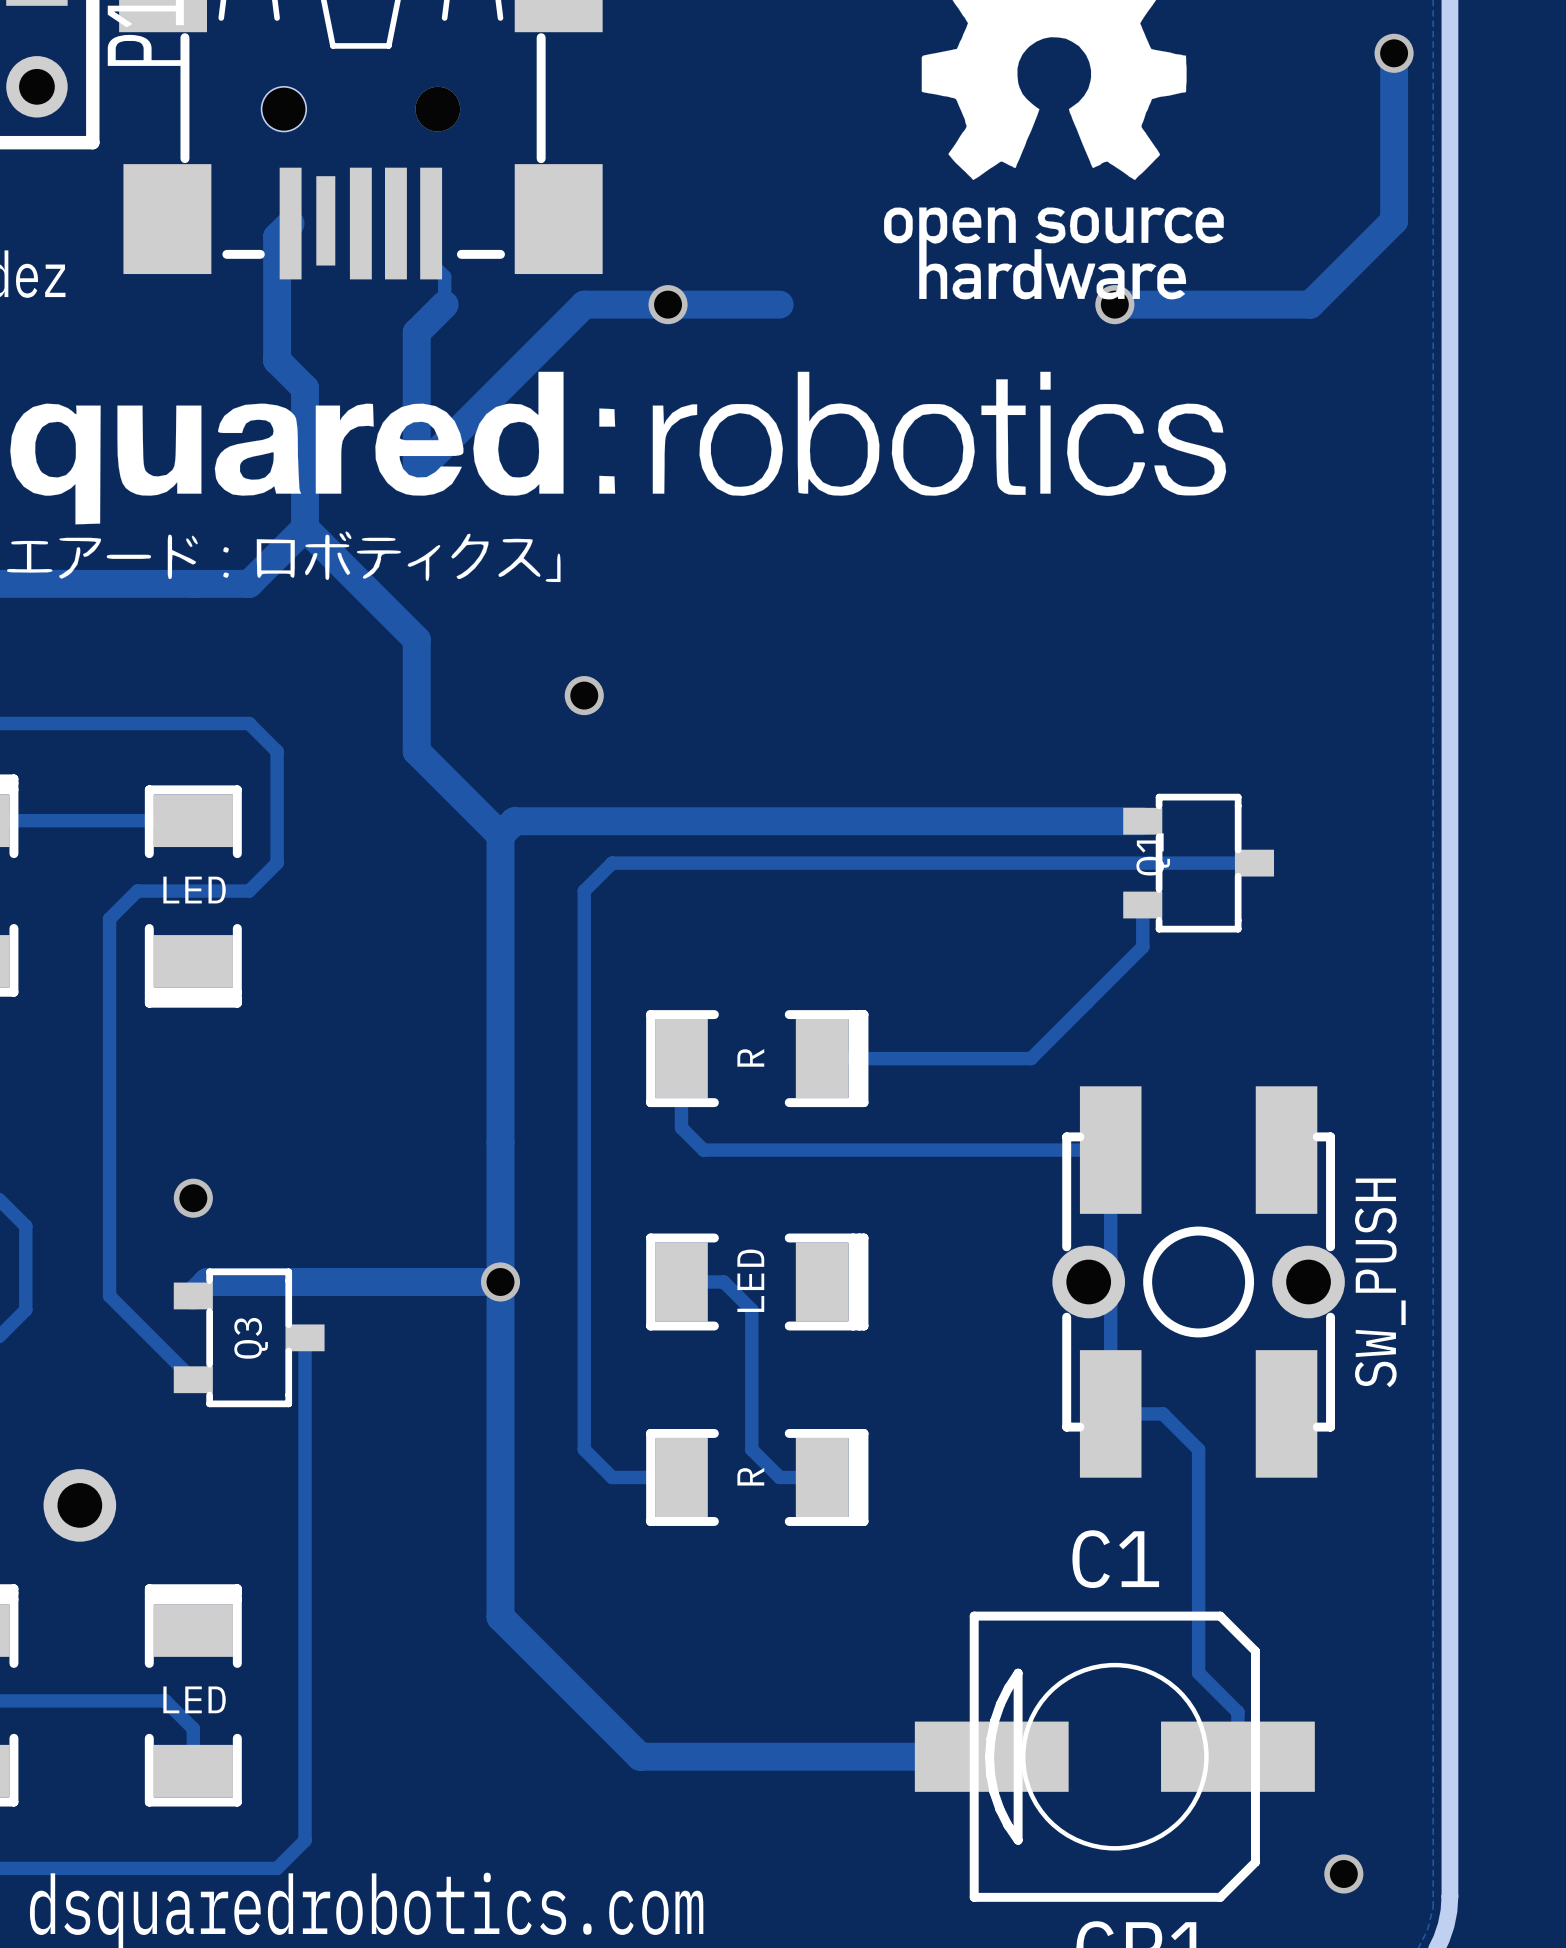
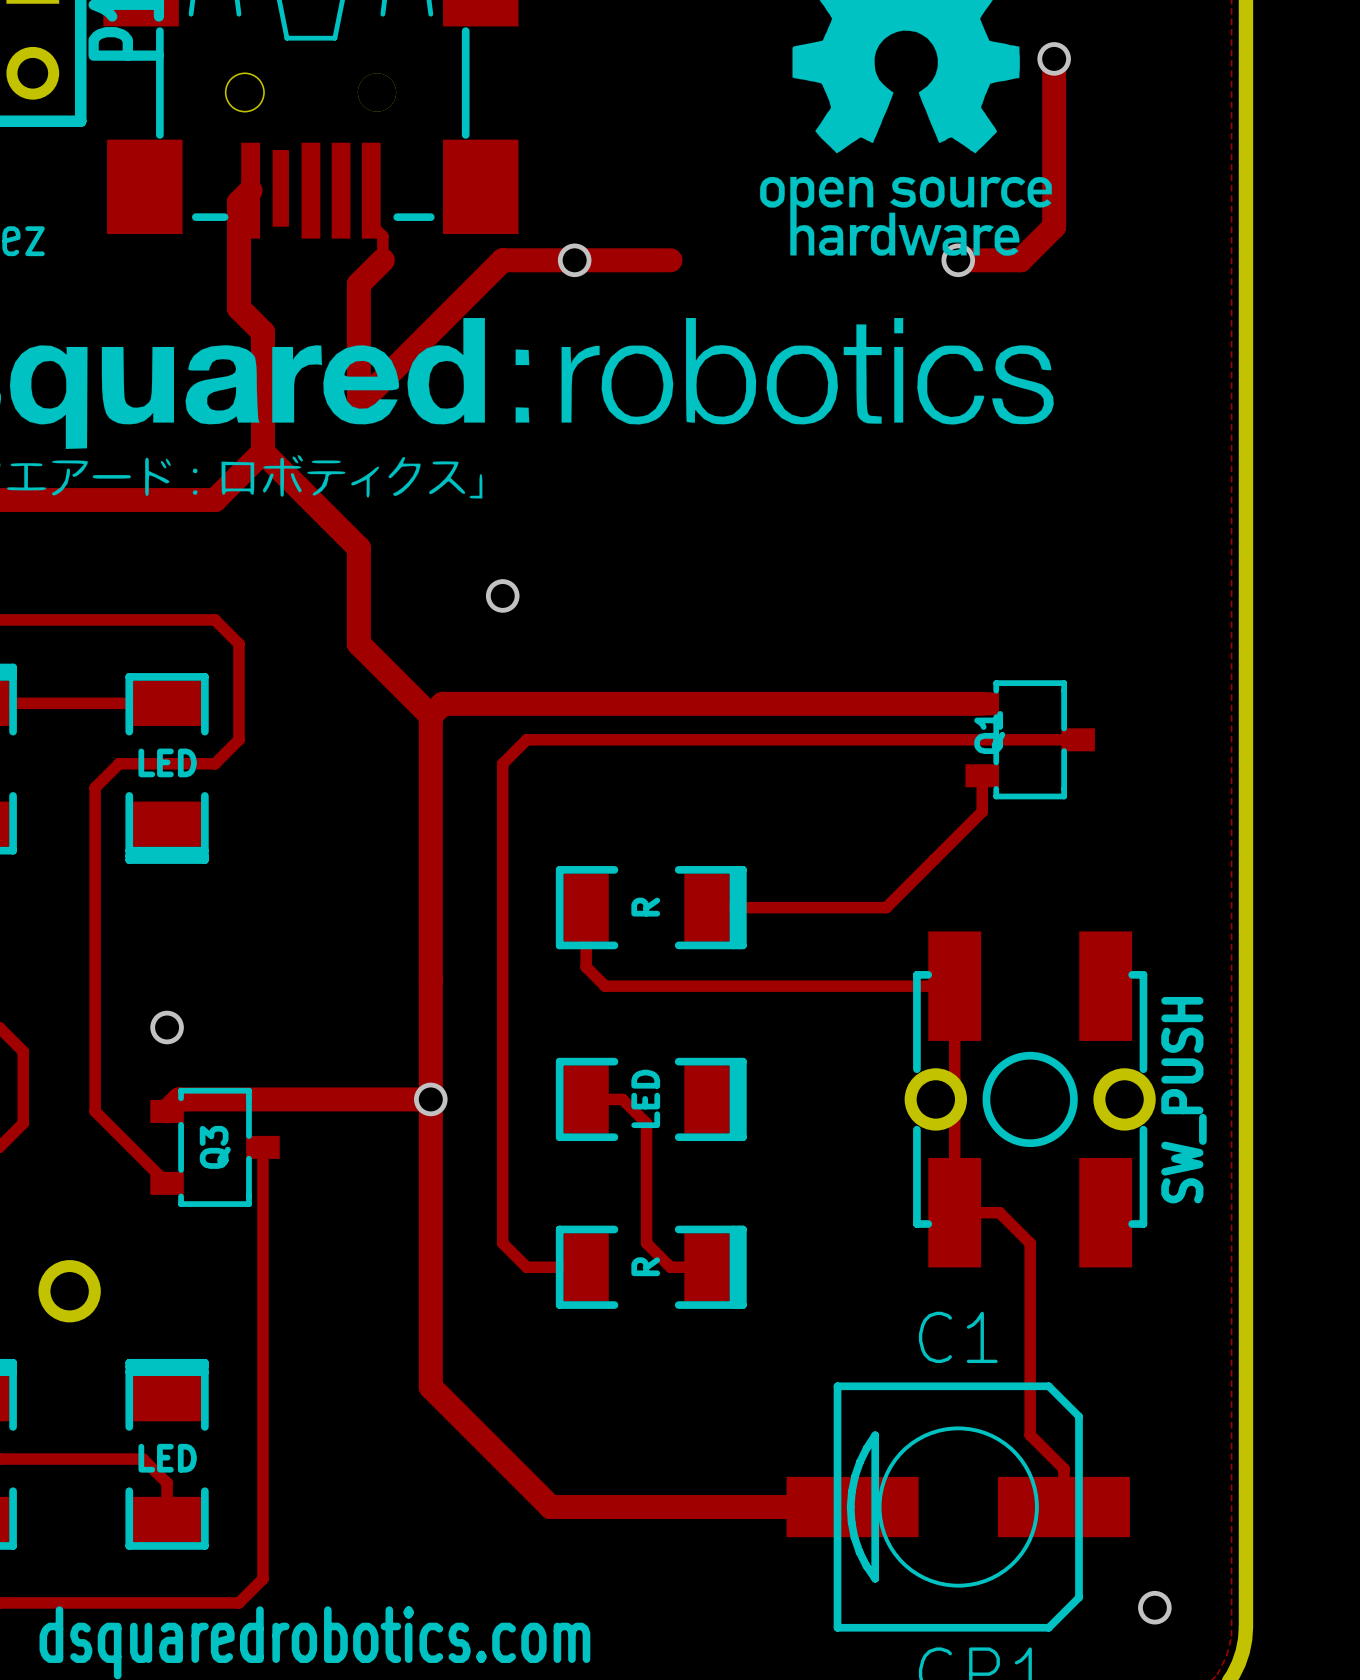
track: (1394, 53) (1394, 220) (1310, 304) (1187, 304) -> (1054, 58) (1054, 226) (1020, 260)
via: (1394, 53) -> none
via: none -> (1054, 58)

